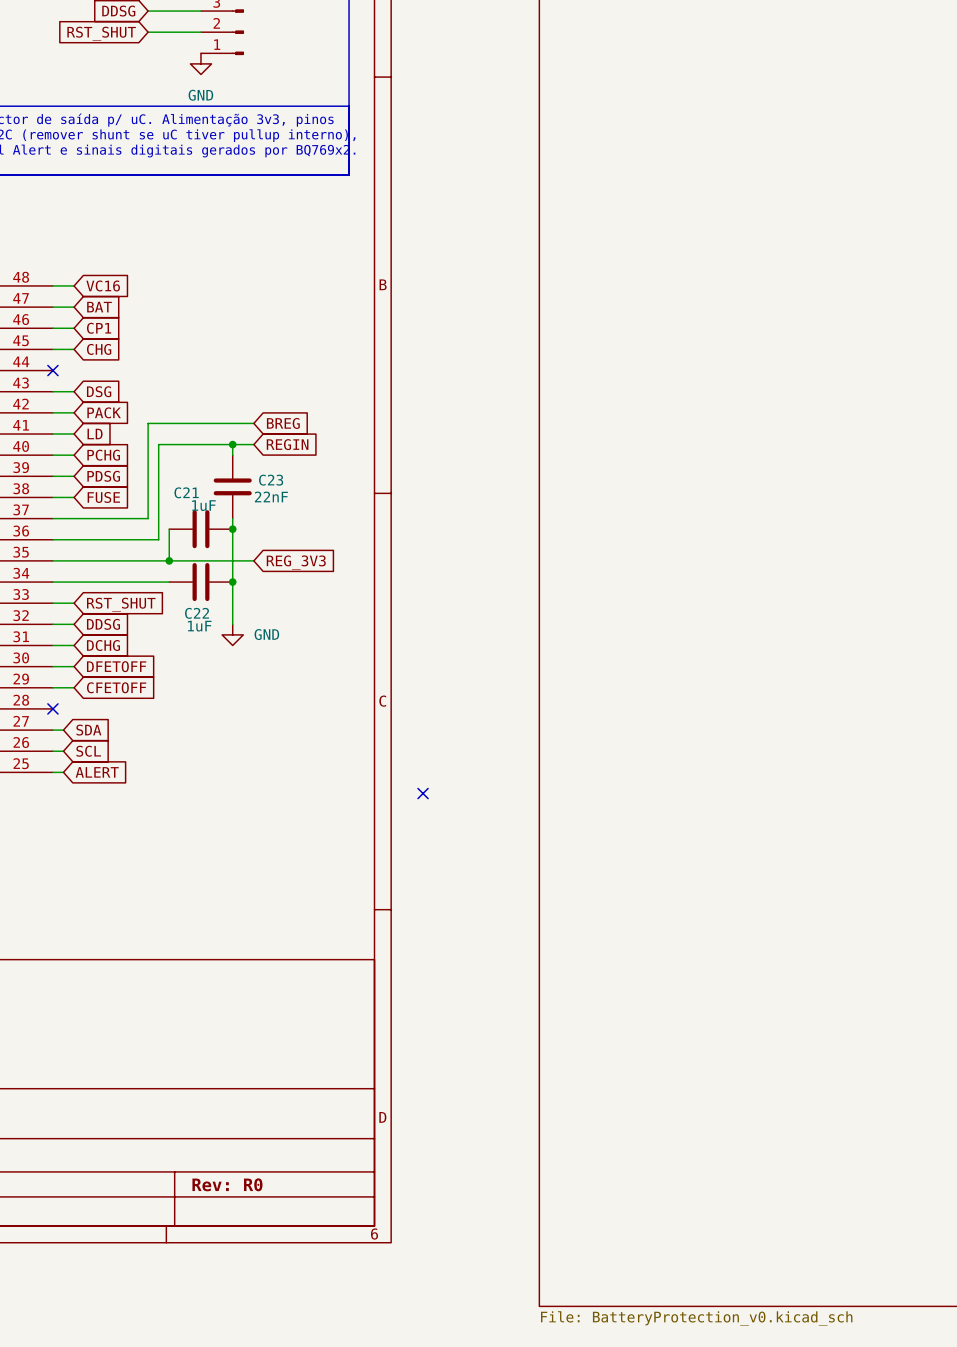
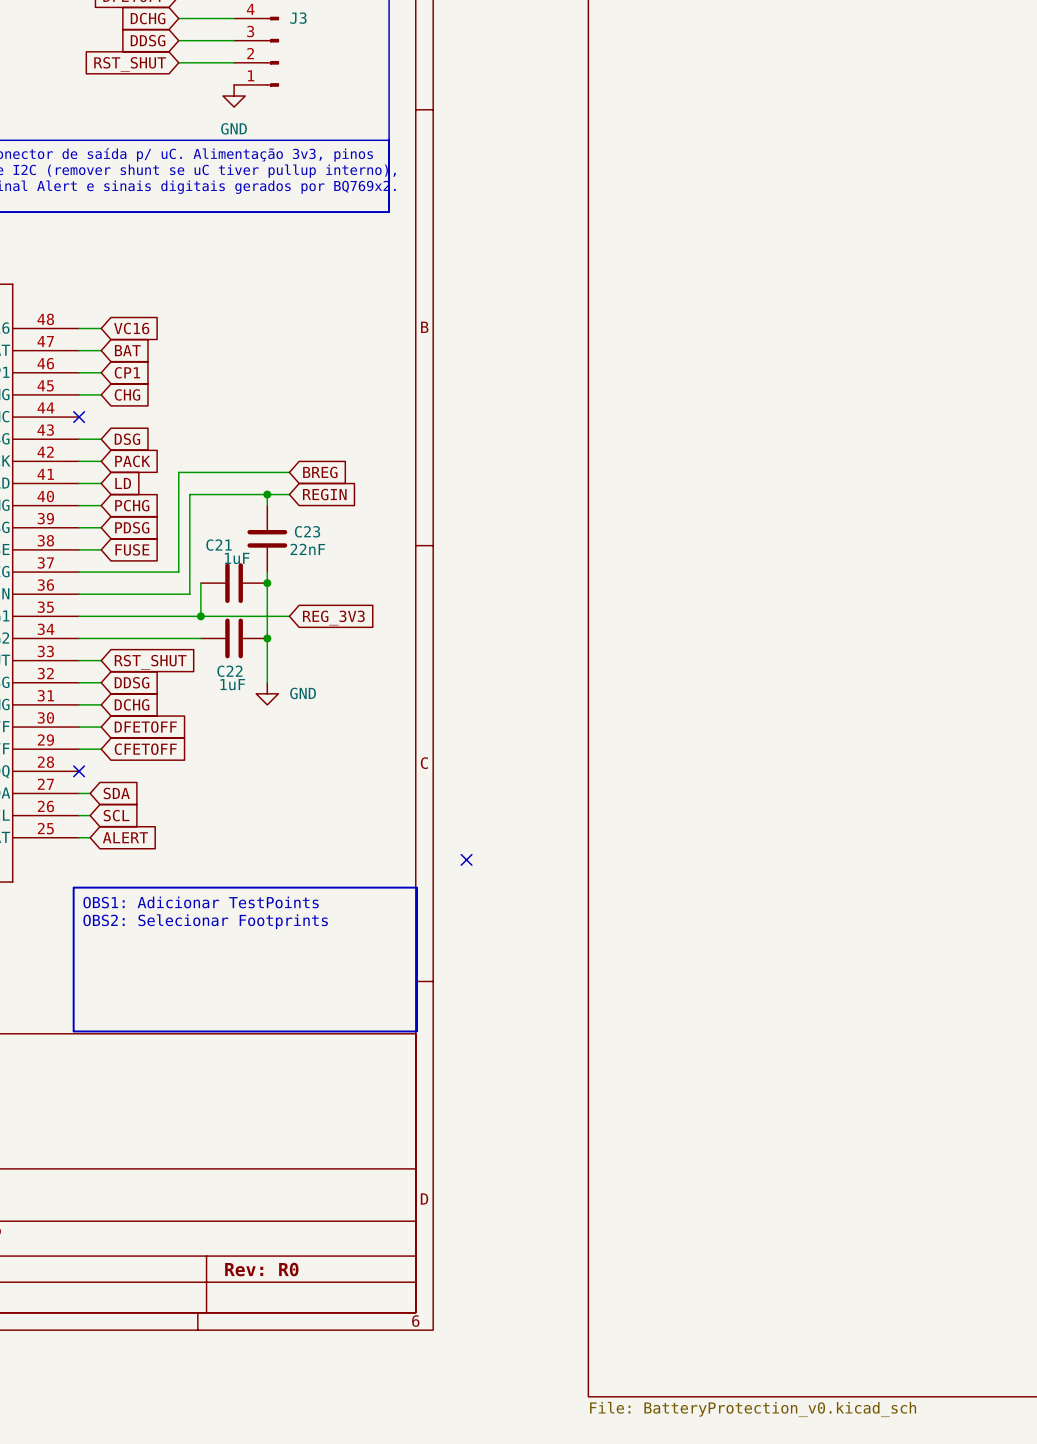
line: none -> (73, 887) (416, 887) (416, 1031) (73, 1031) (73, 887)
text: none -> OBS1: Adicionar TestPoints (201, 902)
text: none -> OBS2: Selecionar Footprints (205, 921)

